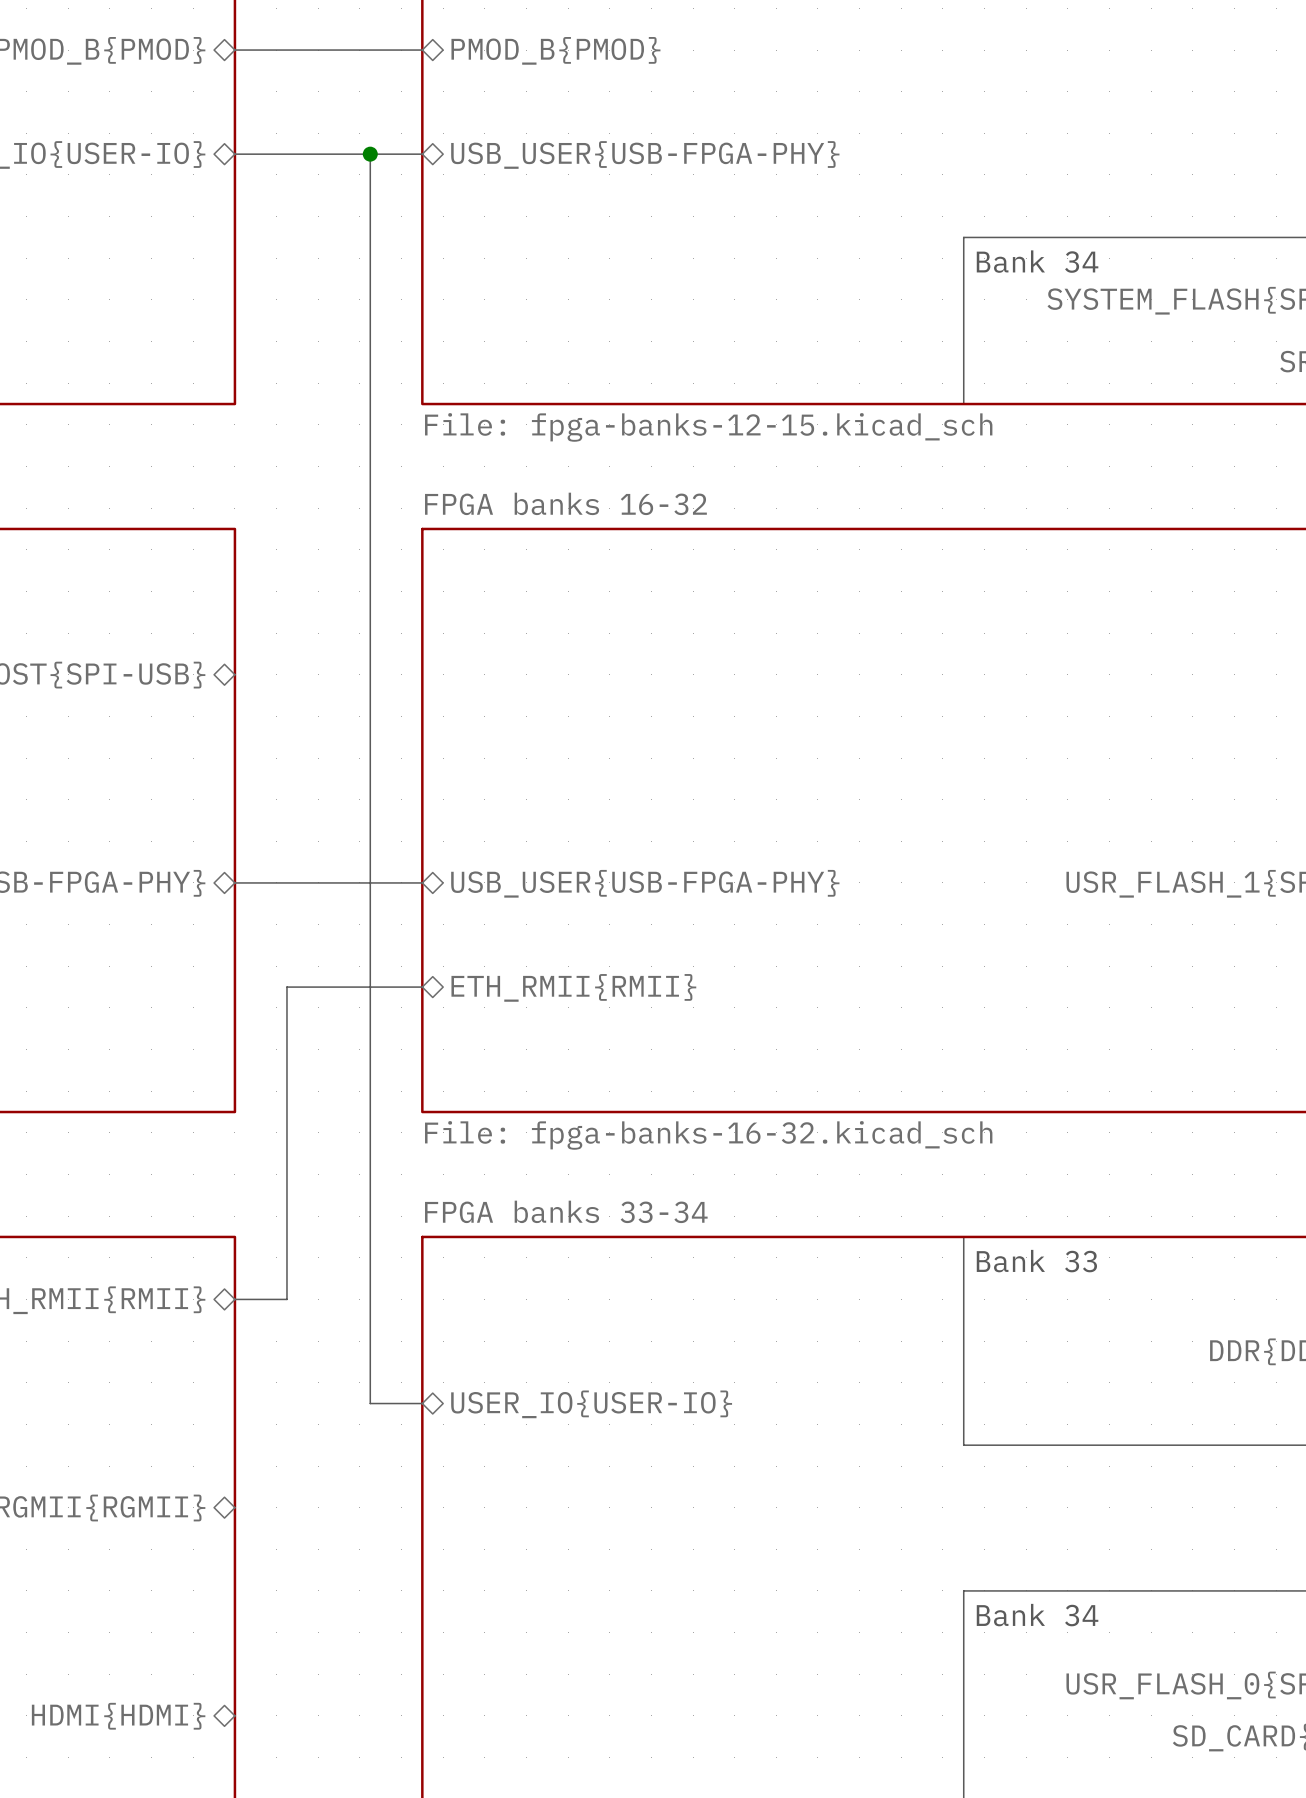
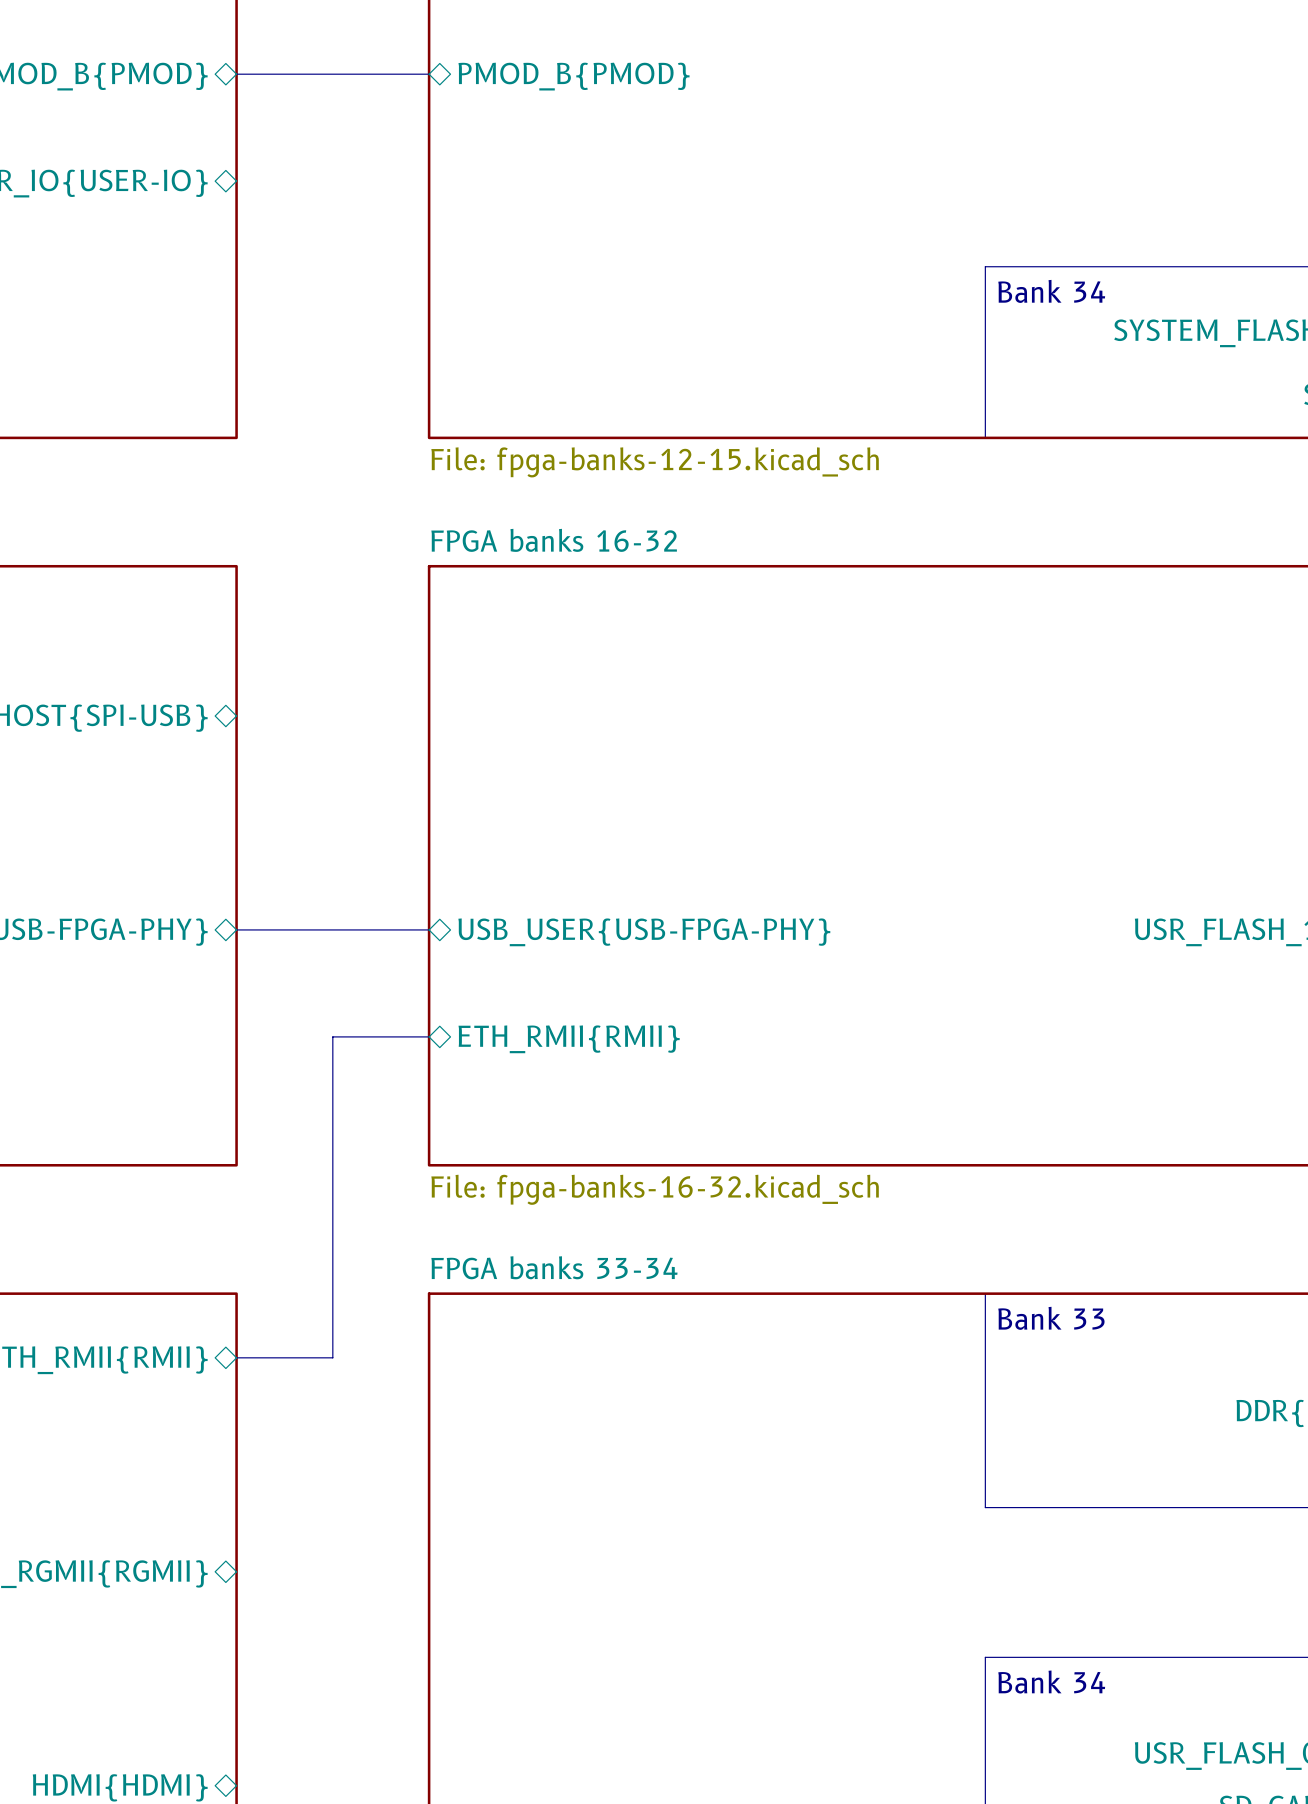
bus: (234, 154) (422, 154) -> none
bus: (370, 154) (370, 1403) (422, 1403) -> none
junction: (370, 154) -> none
sheet pin: USB_USER{USB-FPGA-PHY} (645, 154) -> none
bus: (328, 987) (286, 987) (286, 1299) -> (332, 1036) (332, 1357) (290, 1357)
sheet pin: USER_IO{USER-IO} (591, 1404) -> none

